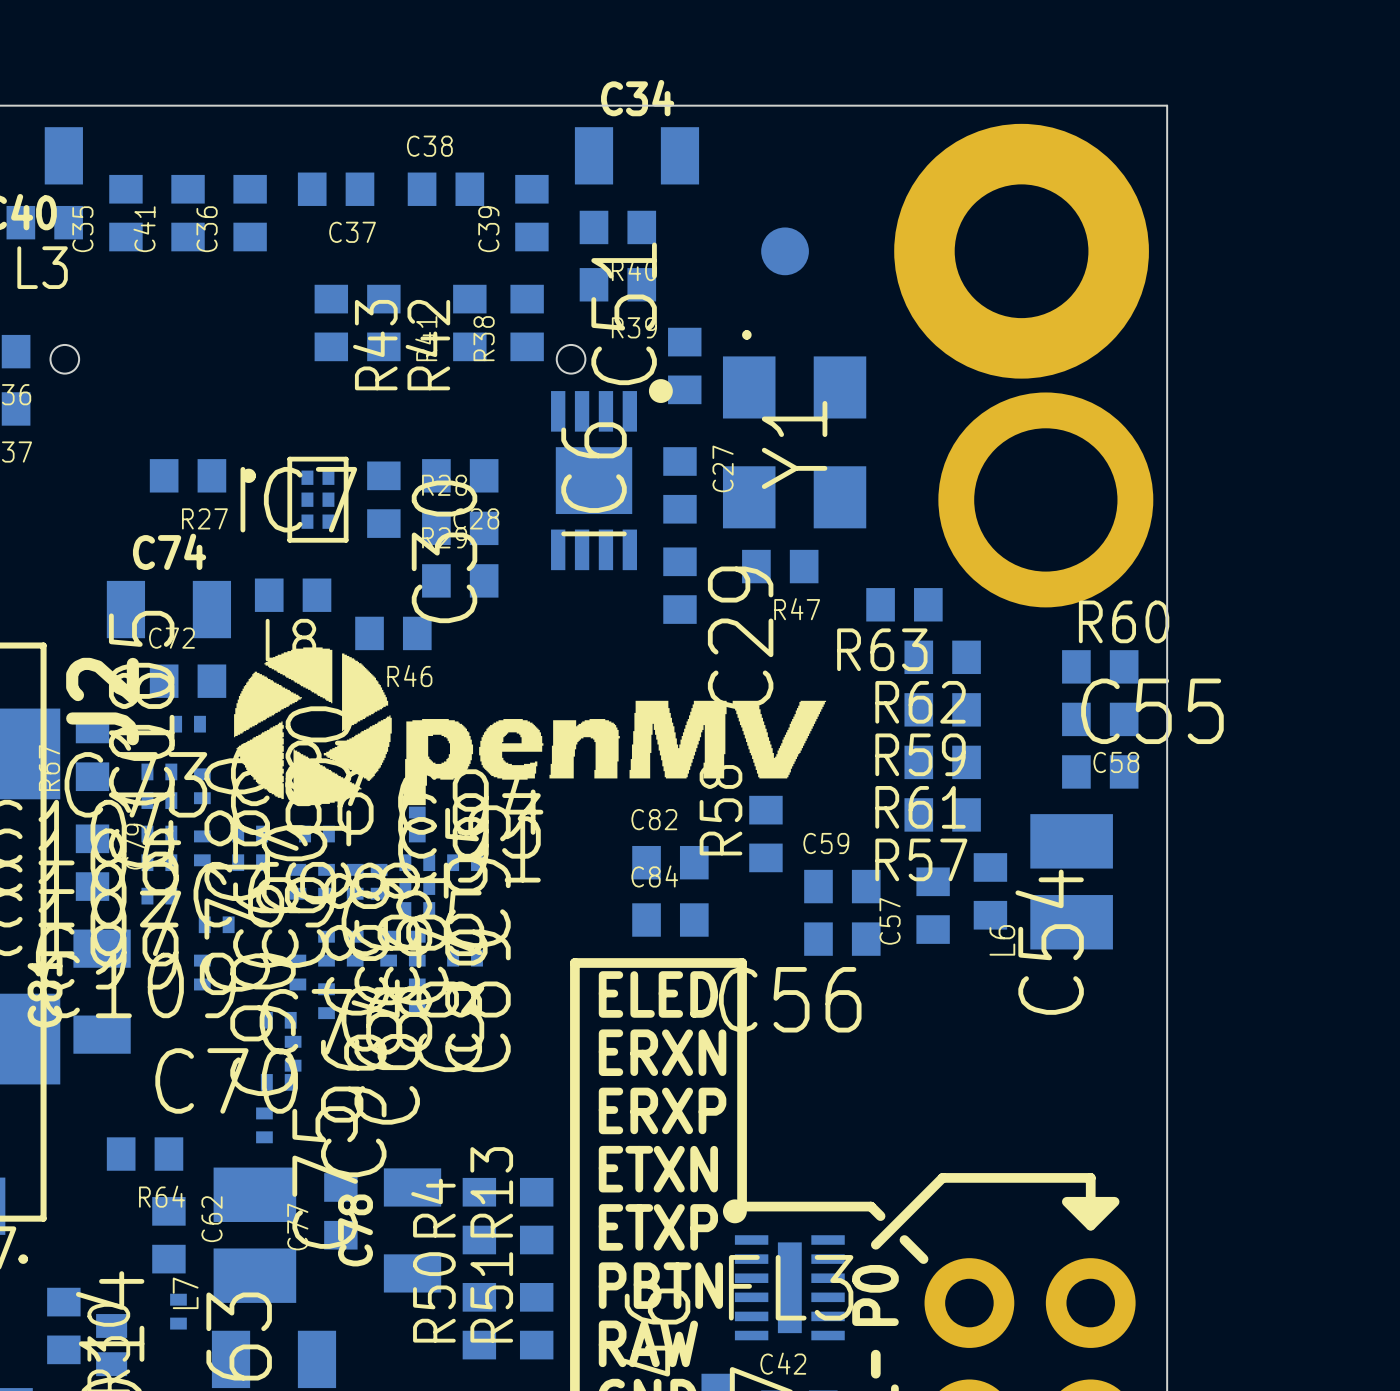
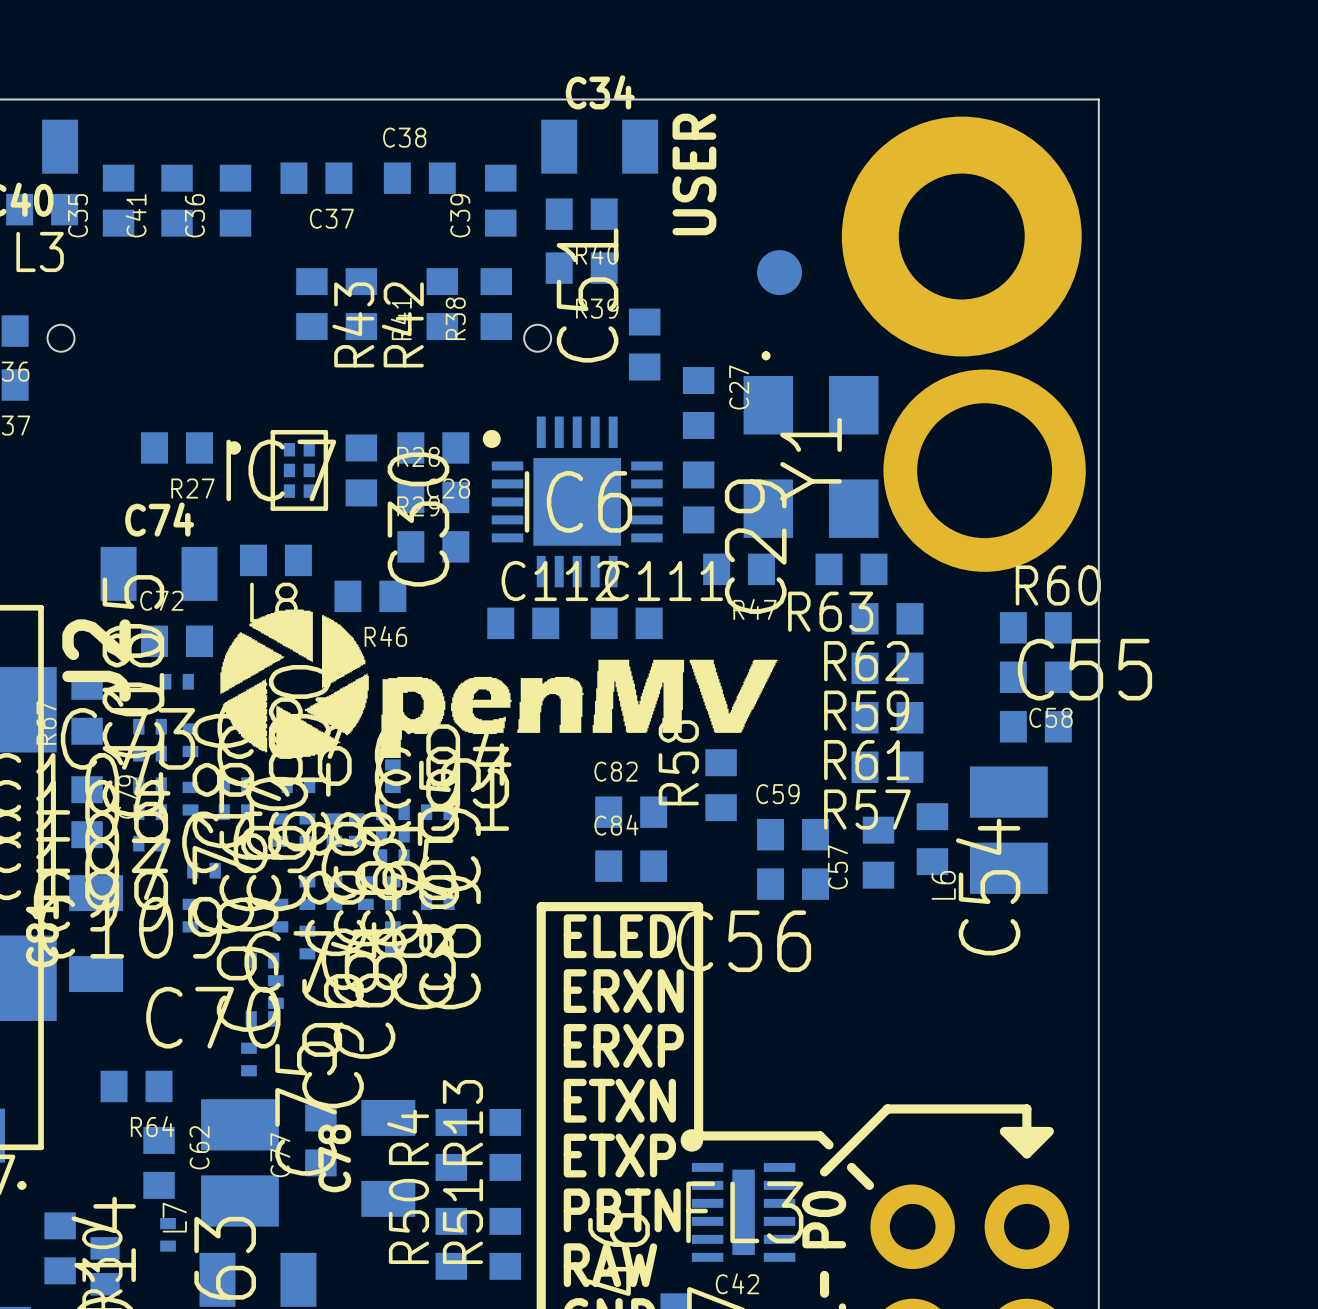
text: none -> USER (694, 174)
part position: (785, 251) -> (779, 272)
IC6 footprint: [551, 379, 673, 571] -> [482, 416, 663, 588]
Y1 position: (794, 429) -> (811, 444)
C27 position: (679, 485) -> (698, 403)
R47 position: (780, 566) -> (739, 569)
C29 position: (679, 585) -> (698, 497)
C112: none -> (523, 623)
C111: none -> (626, 623)

